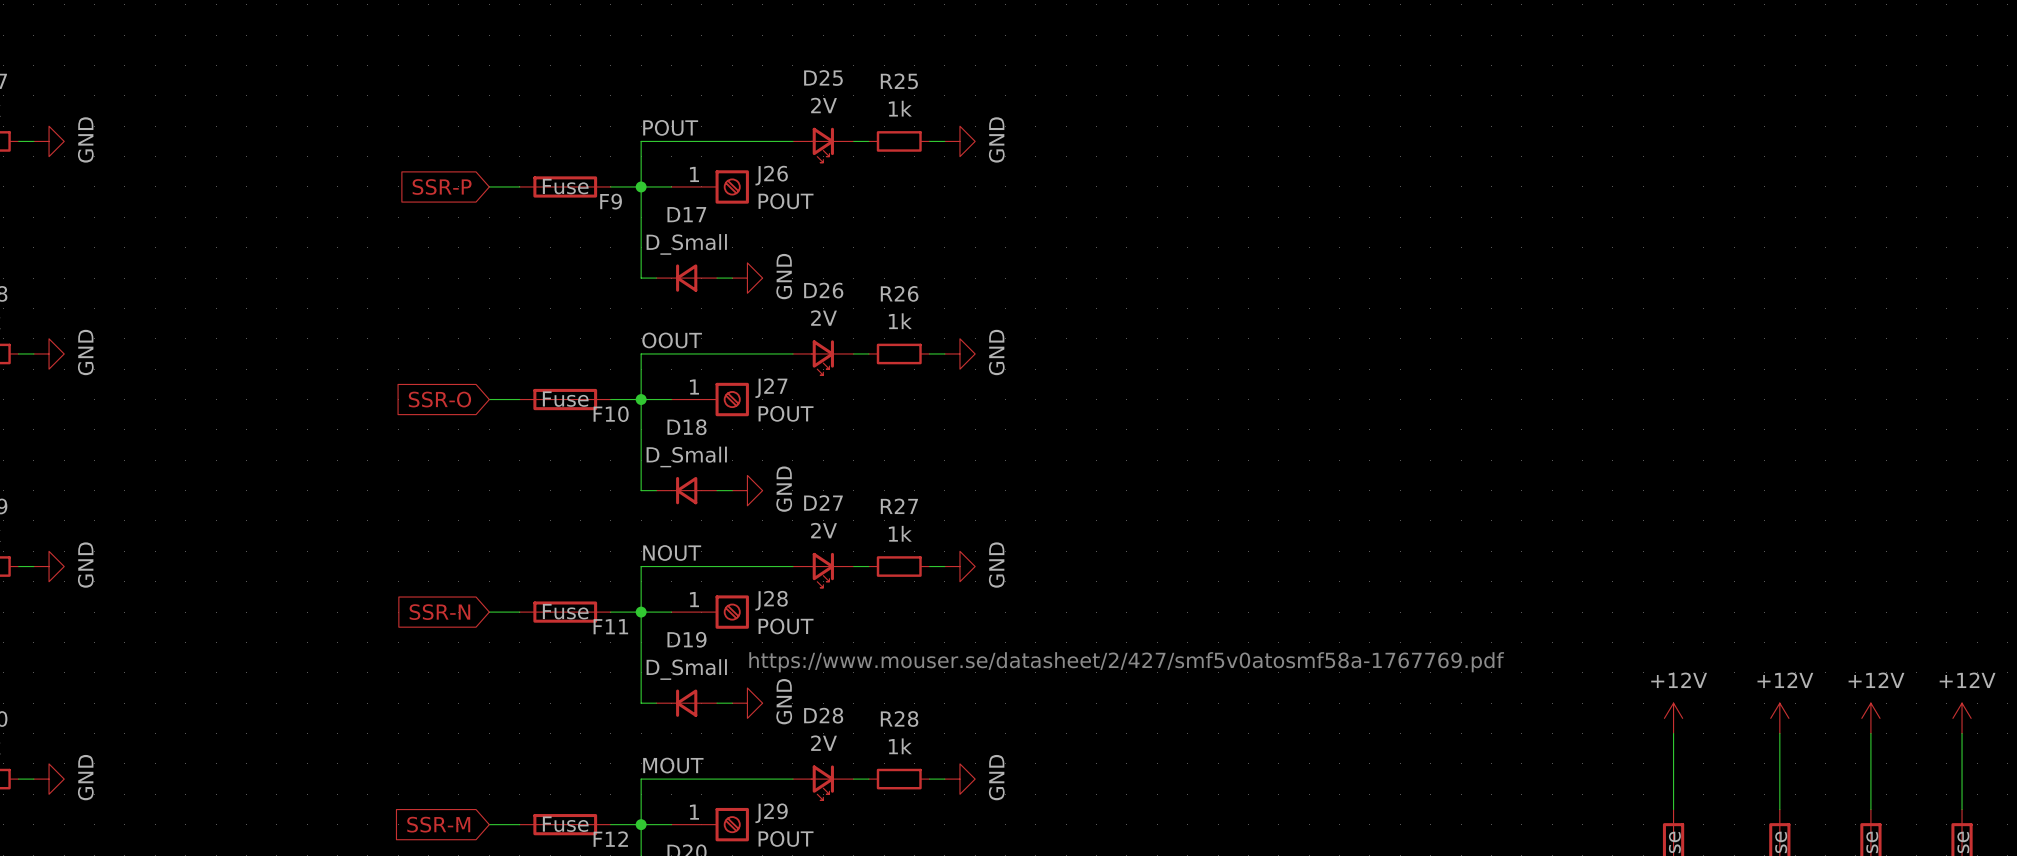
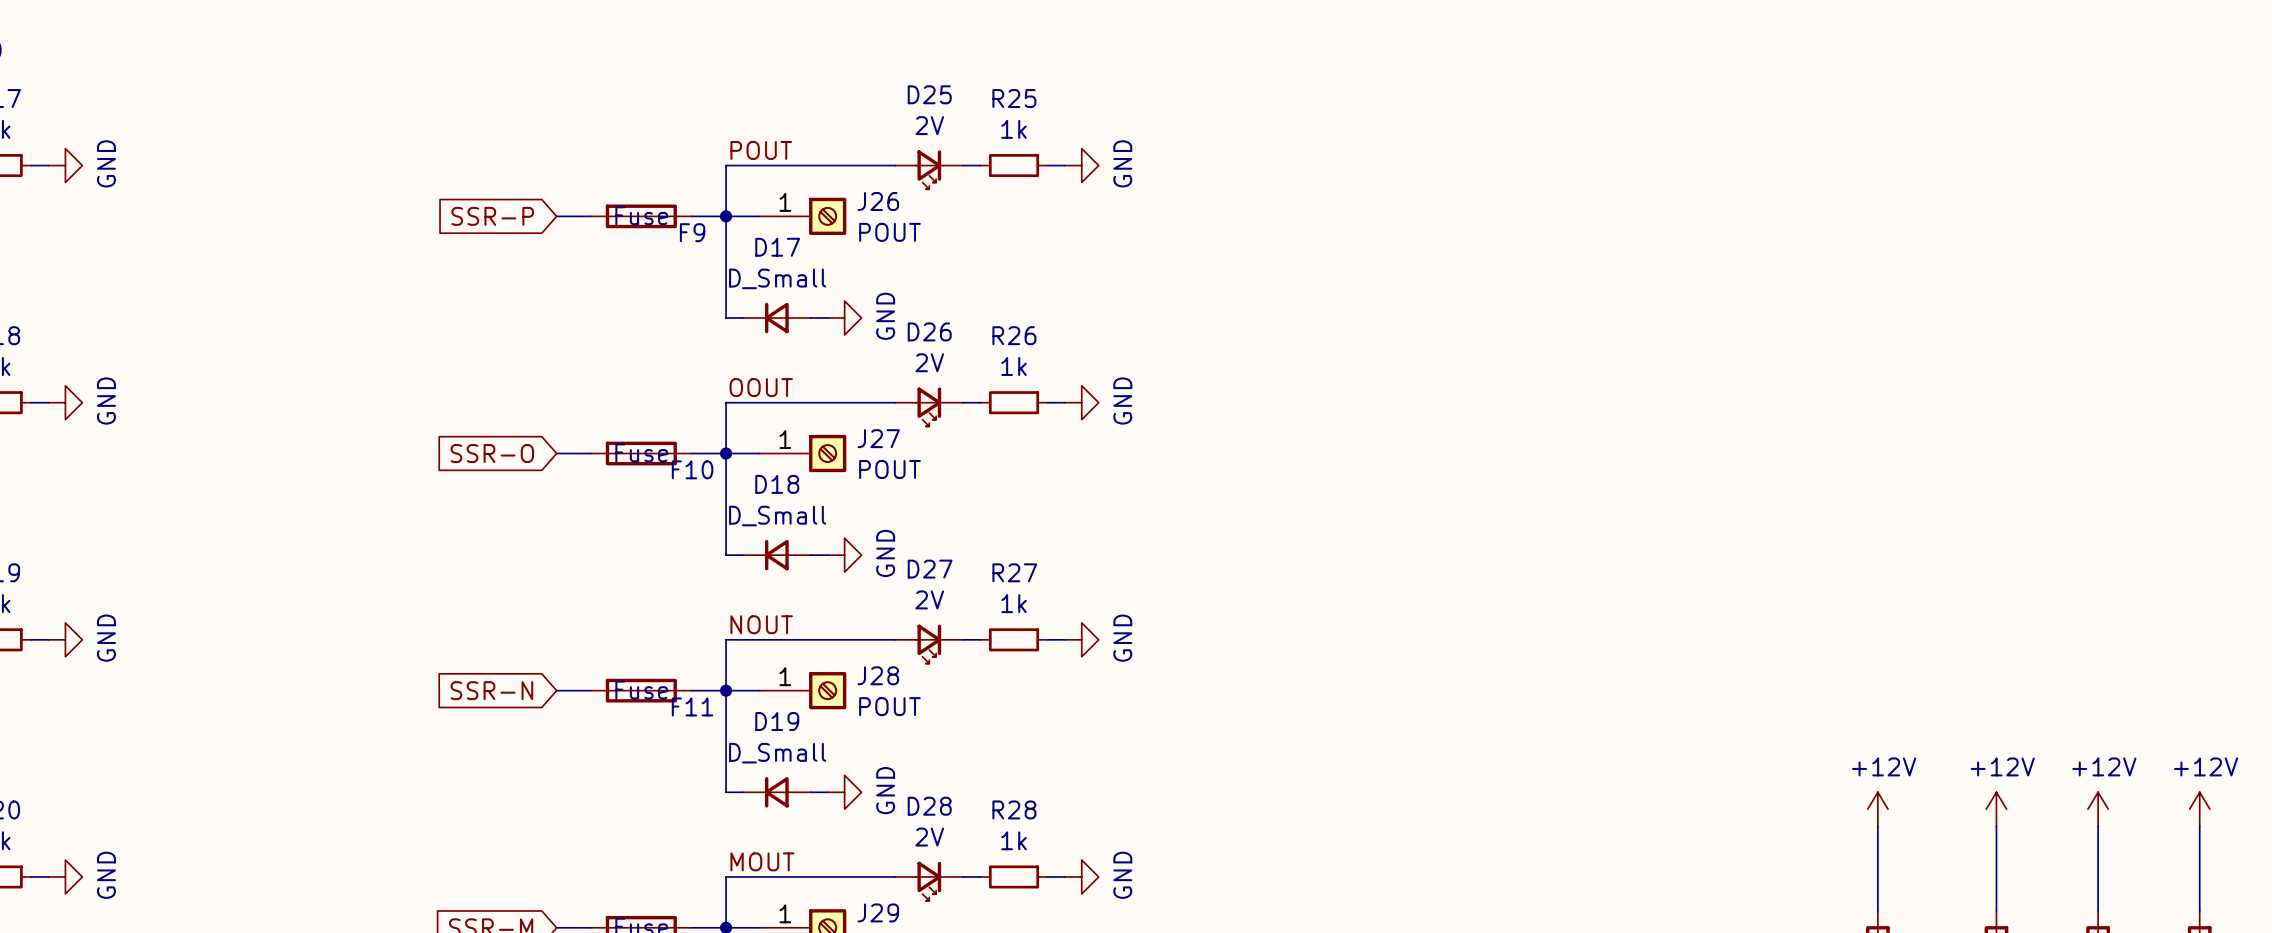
text: https://www.mouser.se/datasheet/2/427/smf5v0atosmf58a-1767769.pdf (1126, 662) -> none

